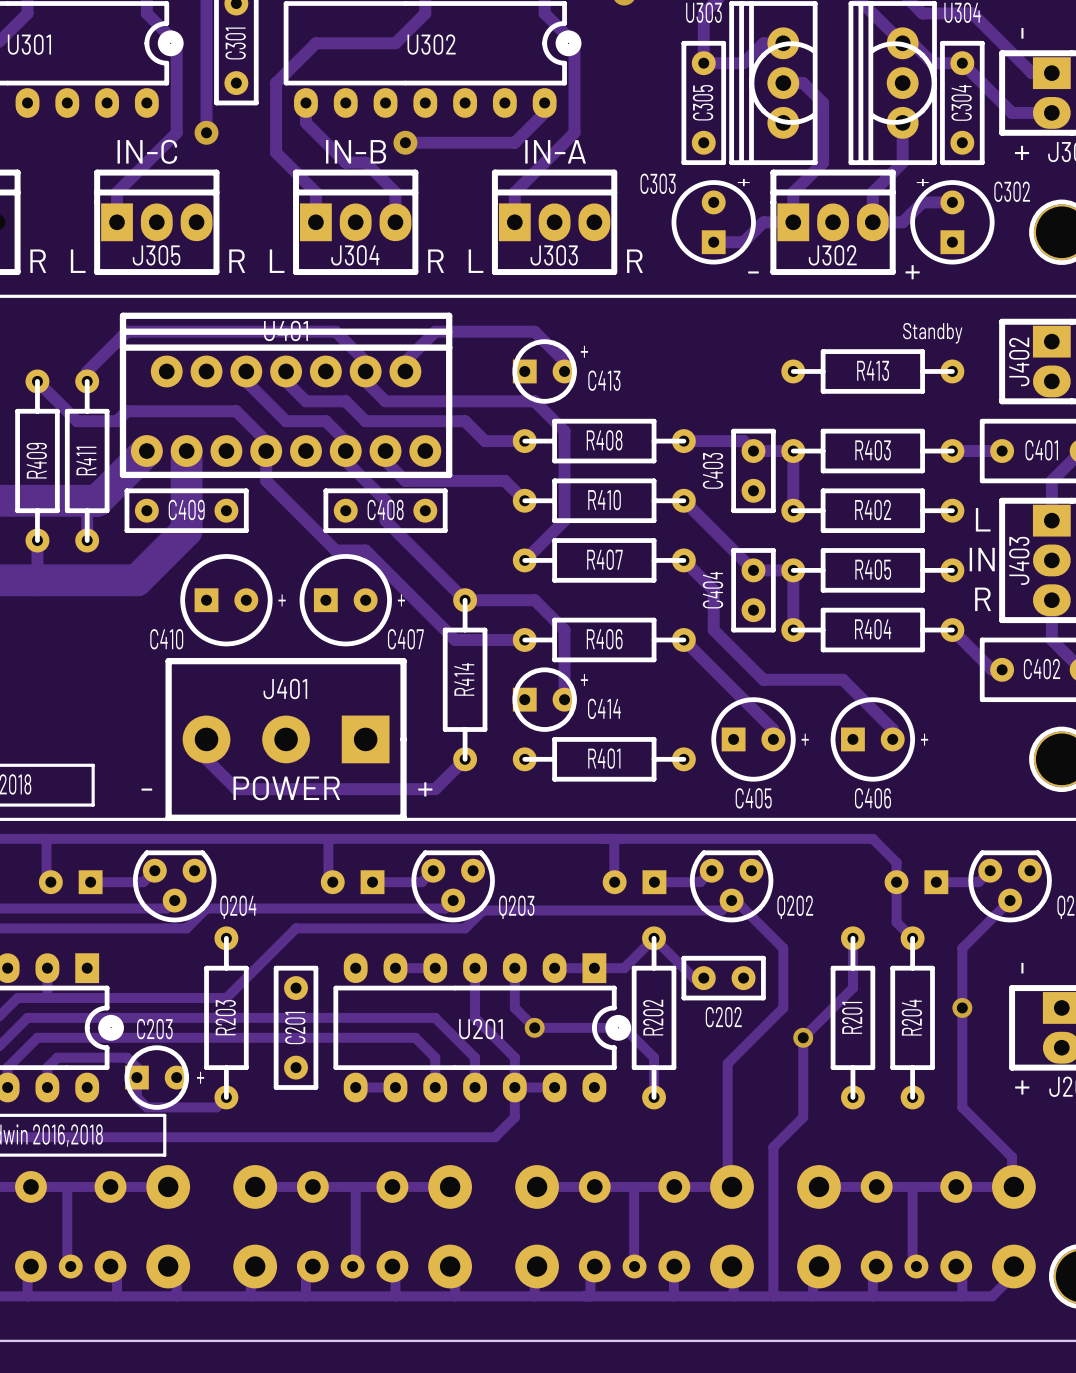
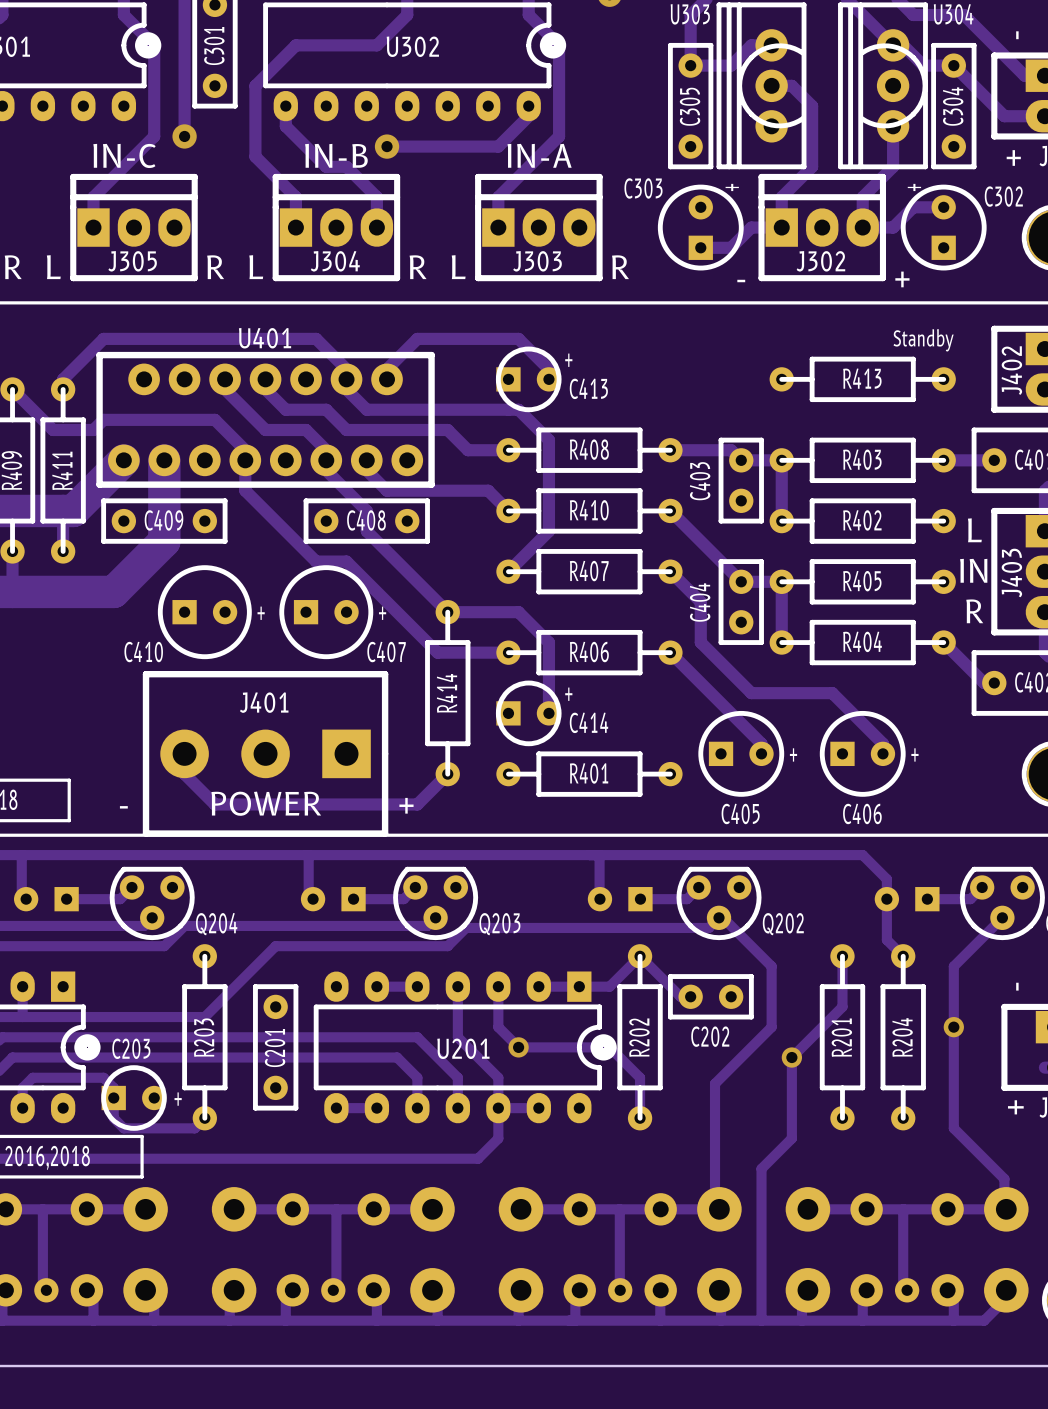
U401 footprint: [119, 312, 453, 479] -> [96, 351, 435, 488]

